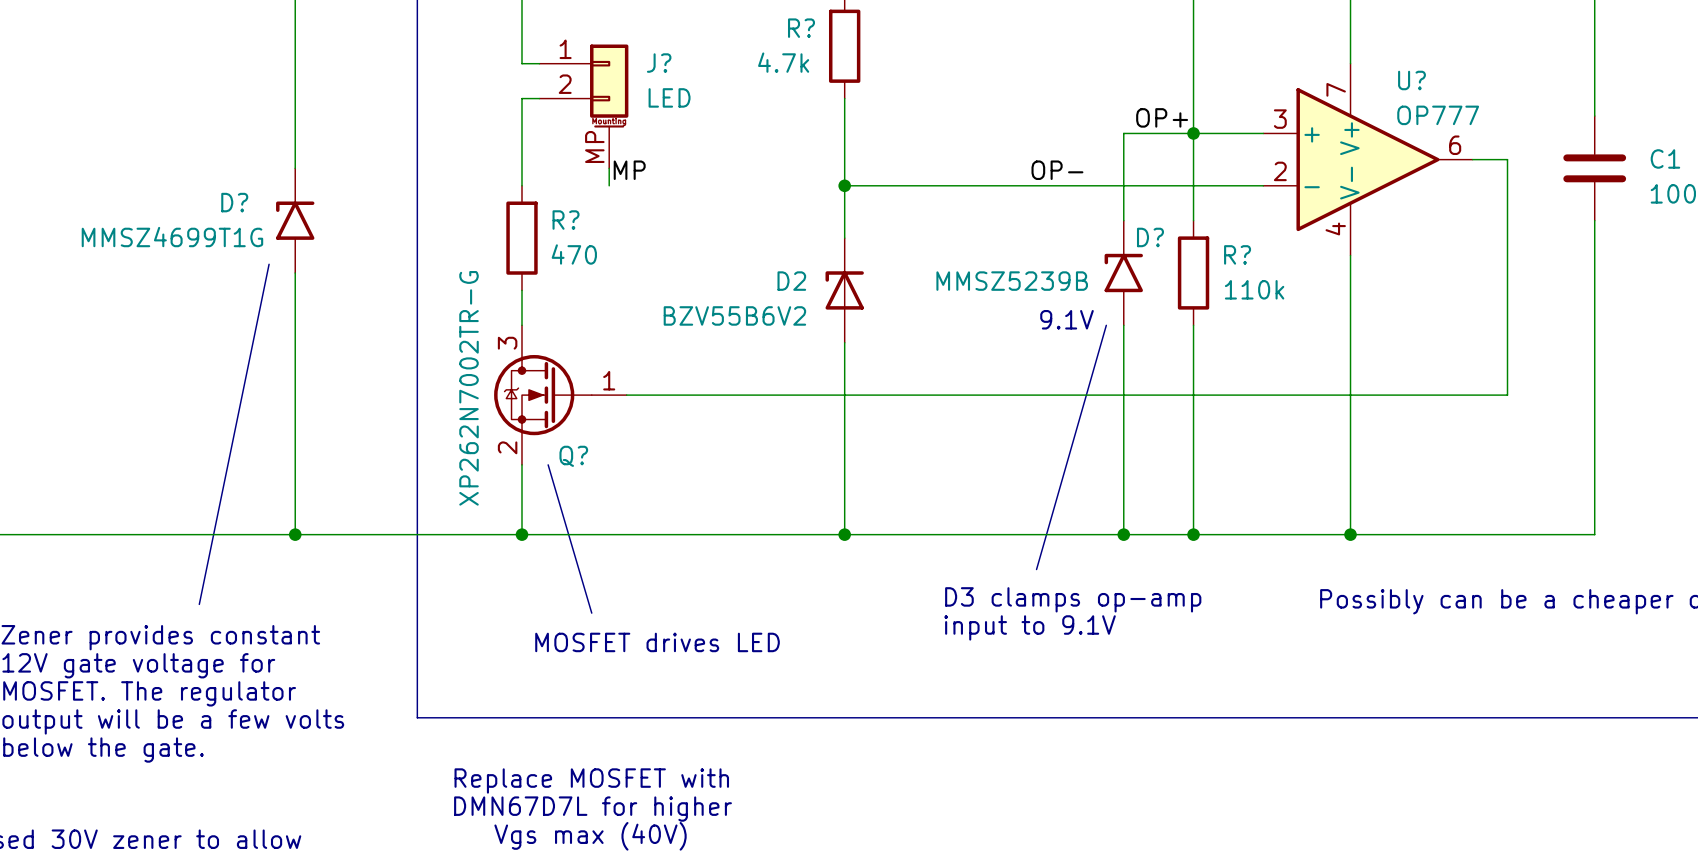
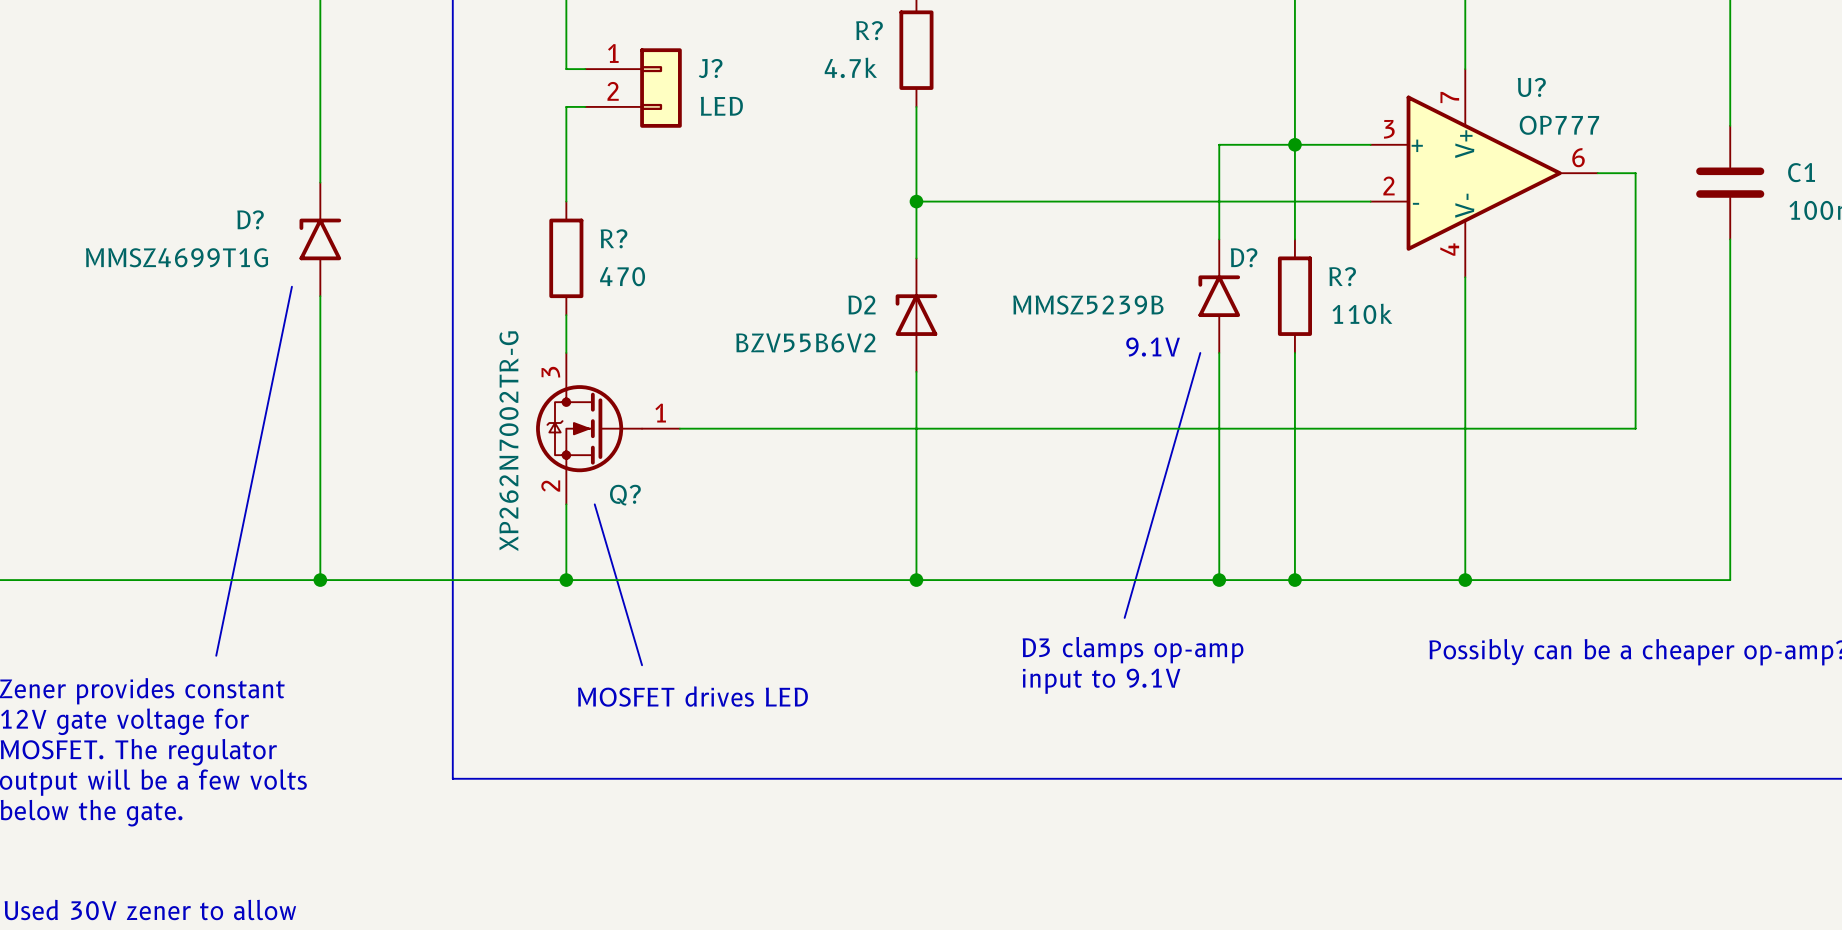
J?: none -> LED (633, 88)
J?: LED (583, 106) -> none
label: OP+ (1162, 117) -> none
wire: (609, 168) (609, 185) -> none
label: MP (629, 170) -> none
label: OP- (1057, 170) -> none
text: Replace MOSFET with (591, 780) -> none
text: DMN67D7L for higher (593, 809) -> none
text: Vgs max (40V) (590, 836) -> none

